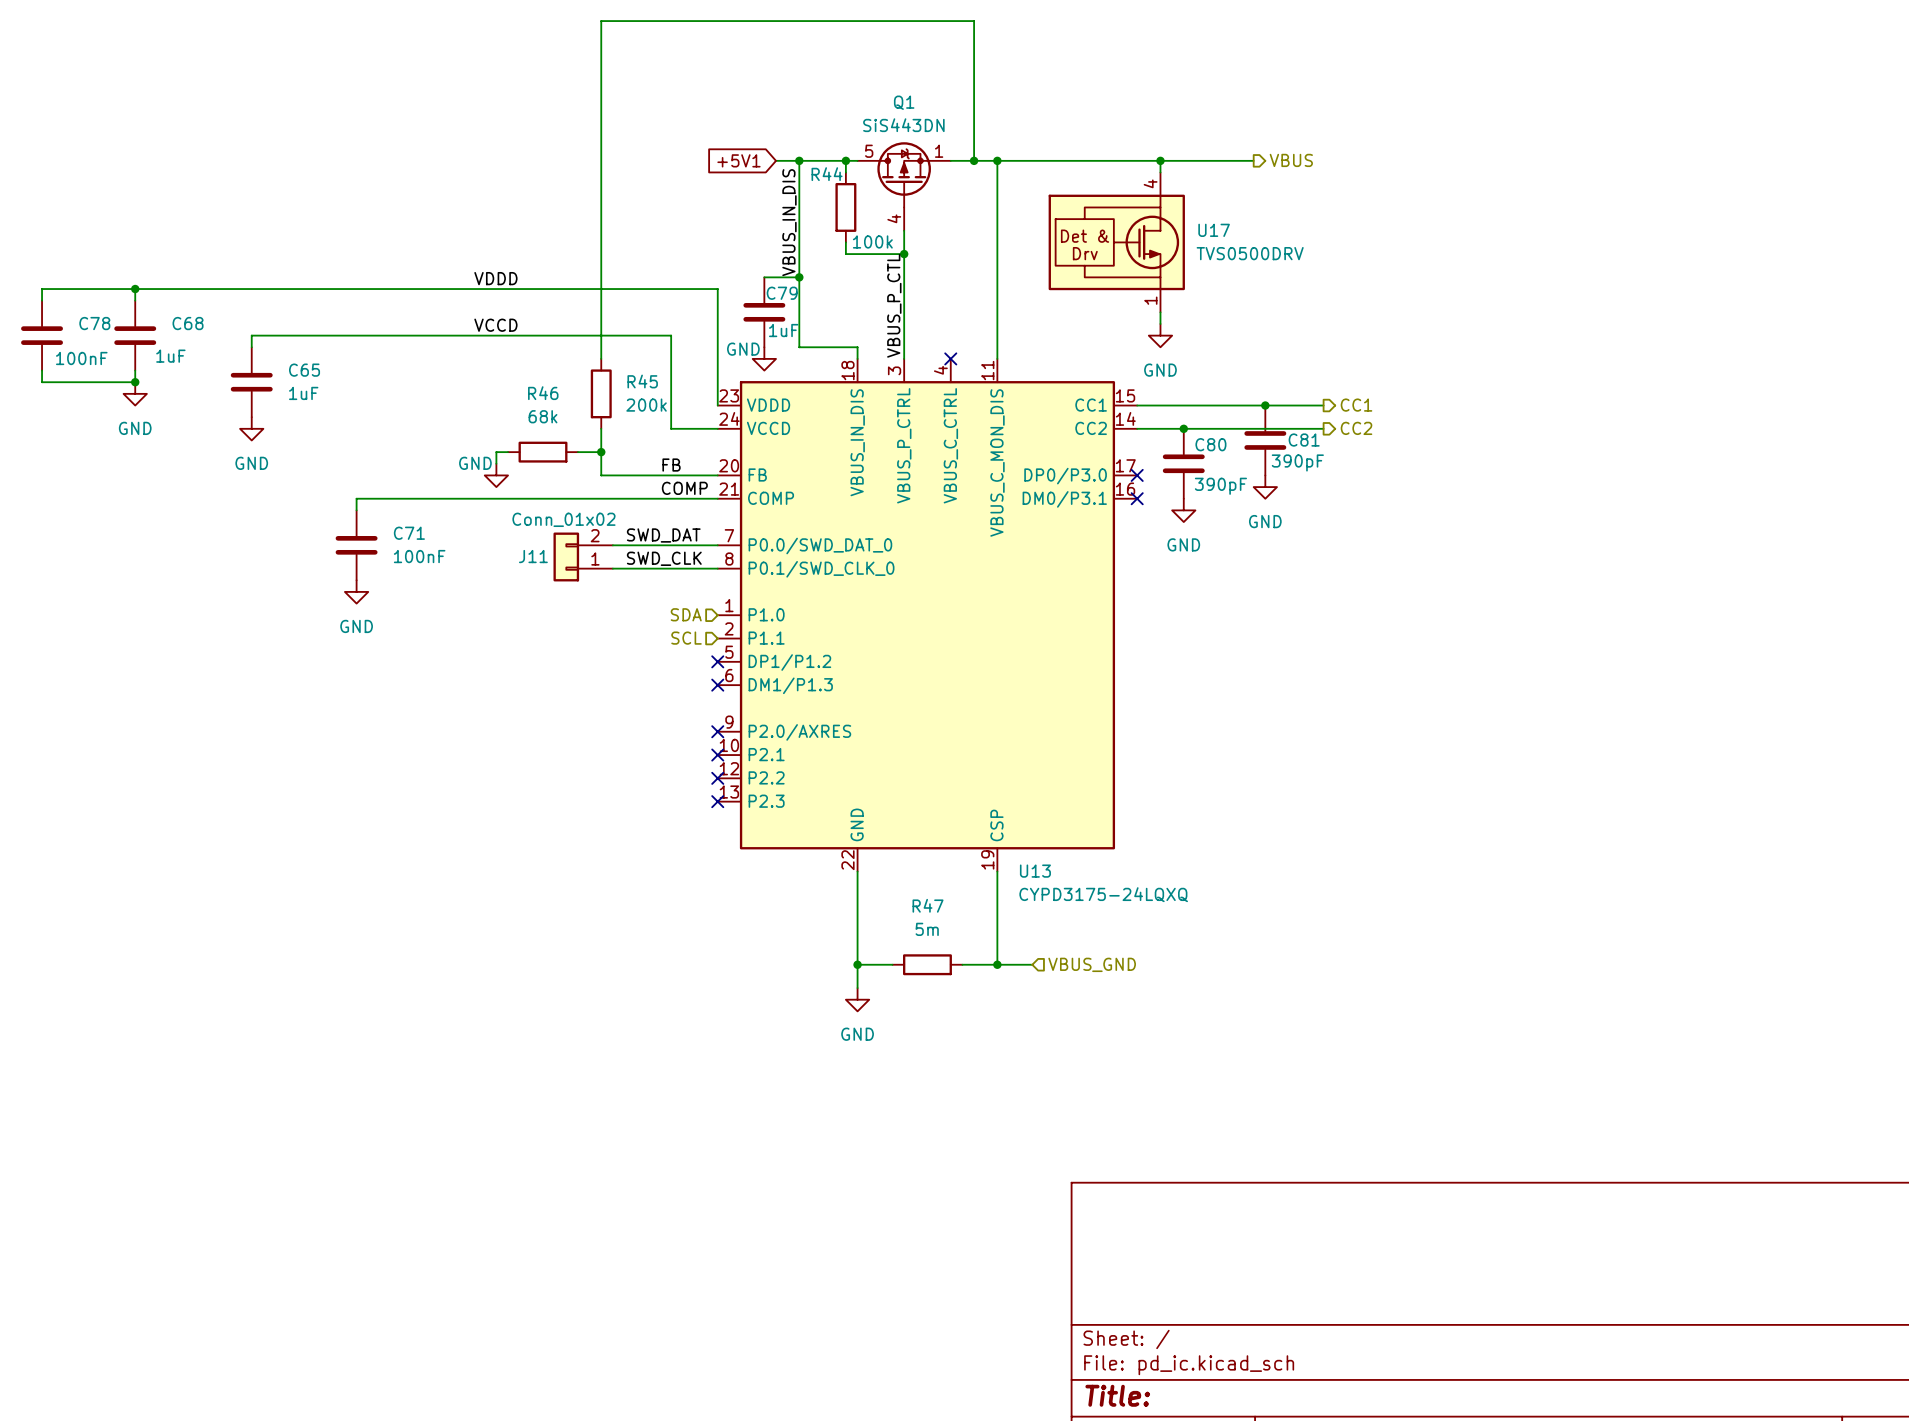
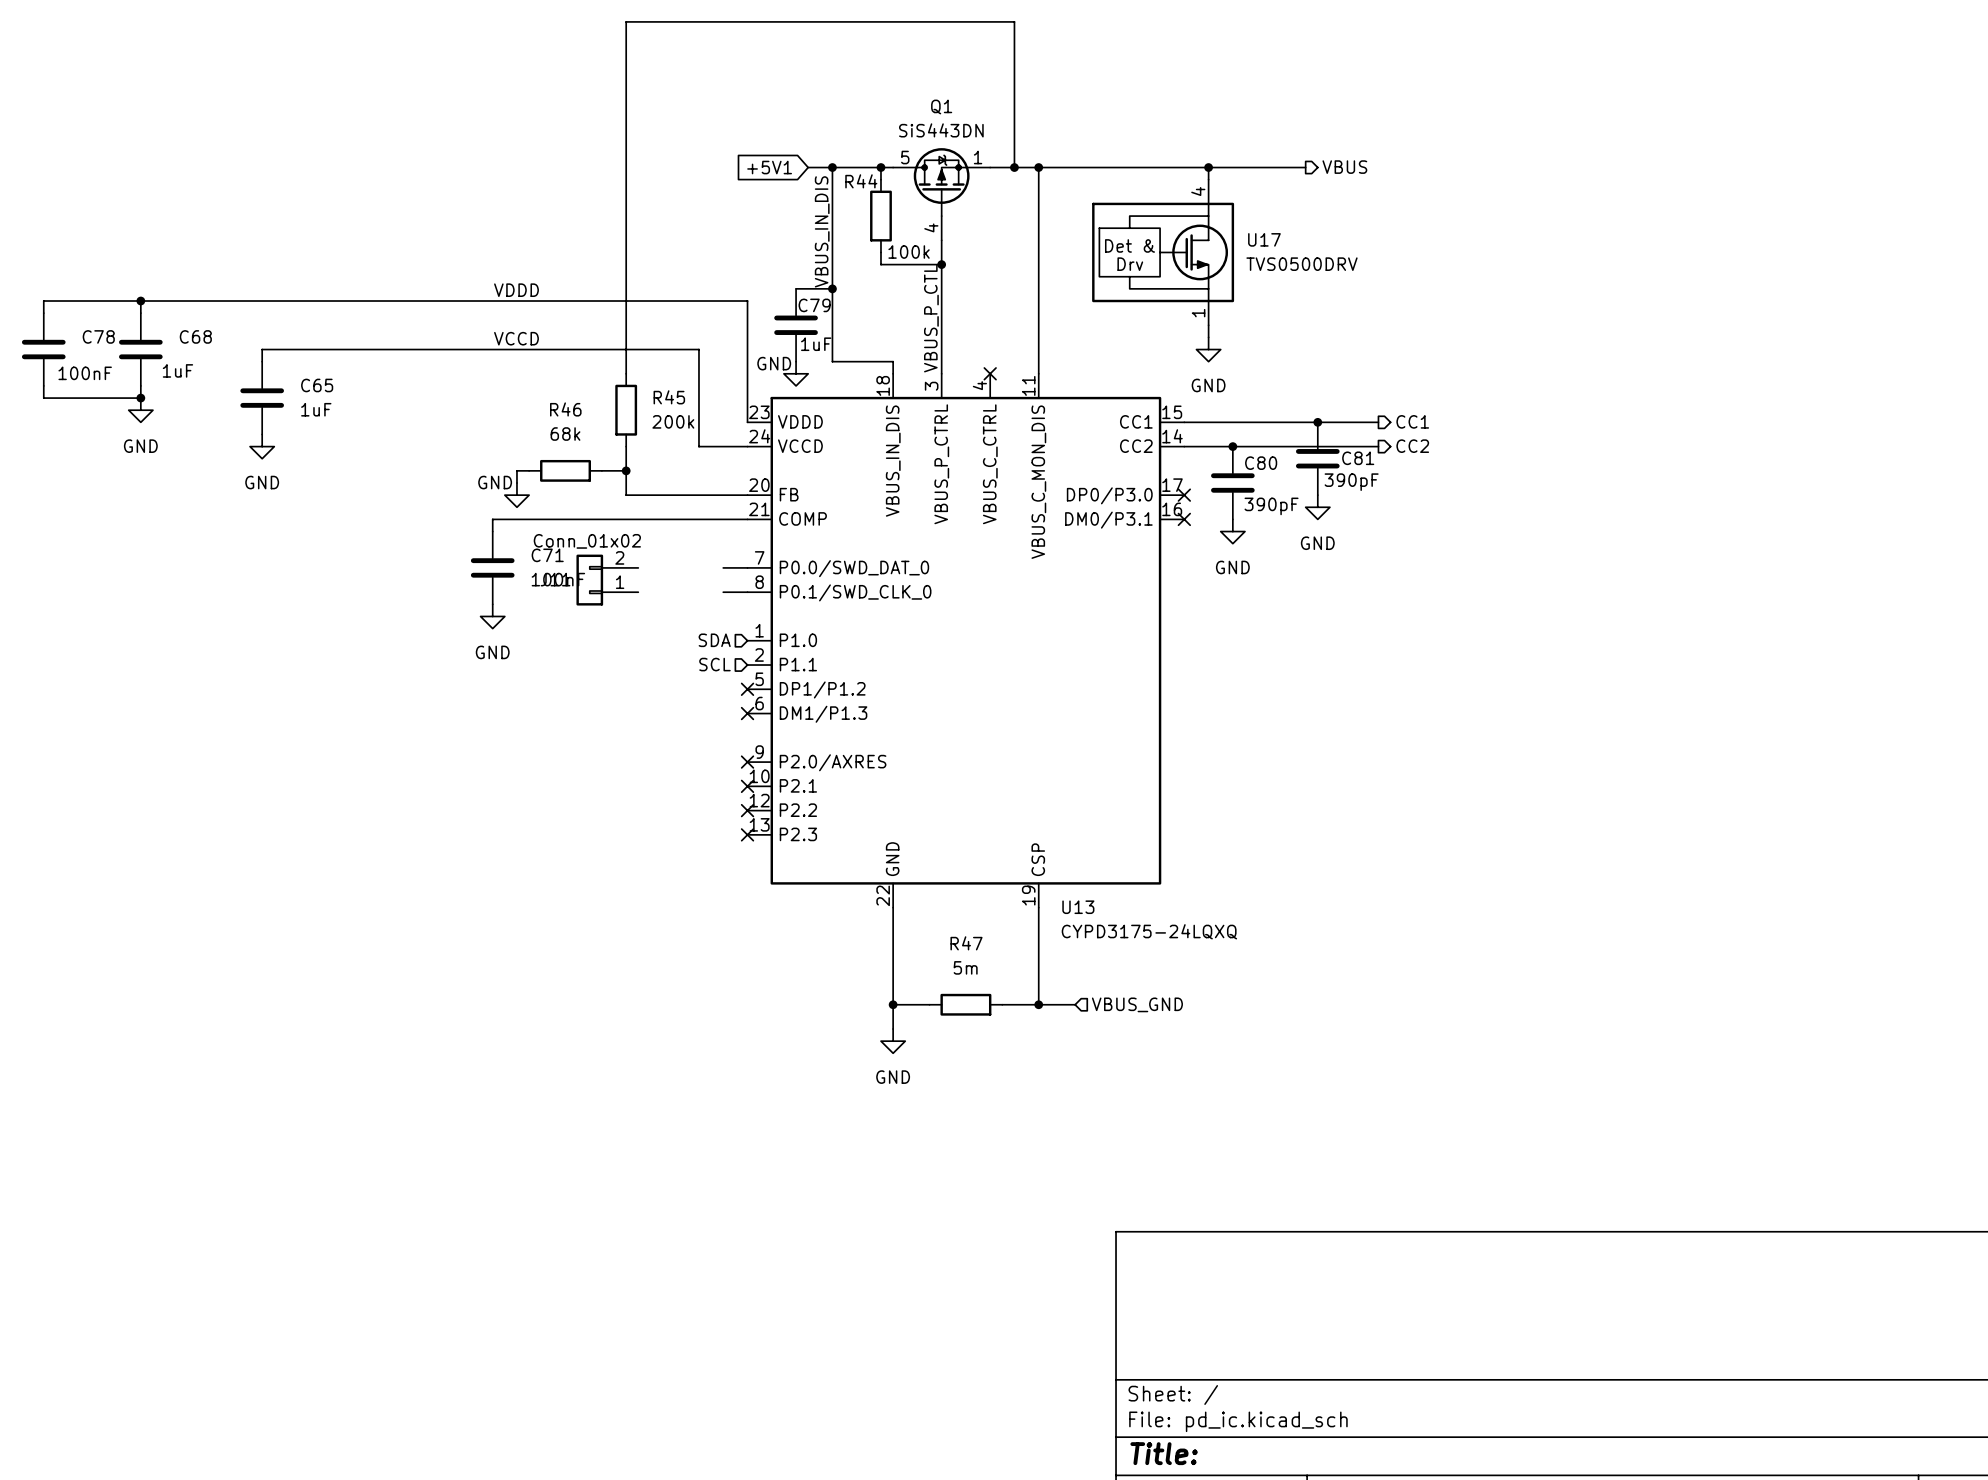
label: FB (671, 465) -> none
label: COMP (684, 488) -> none
wire: (473, 498) (356, 498) (356, 510) -> (492, 519) (492, 531)
label: SWD_DAT (663, 535) -> none
C71 position: (356, 545) -> (492, 567)
wire: (612, 545) (694, 545) -> none
label: SWD_CLK (664, 558) -> none
wire: (612, 568) (694, 568) -> none
power symbol position: GND (356, 591) -> GND (492, 616)

